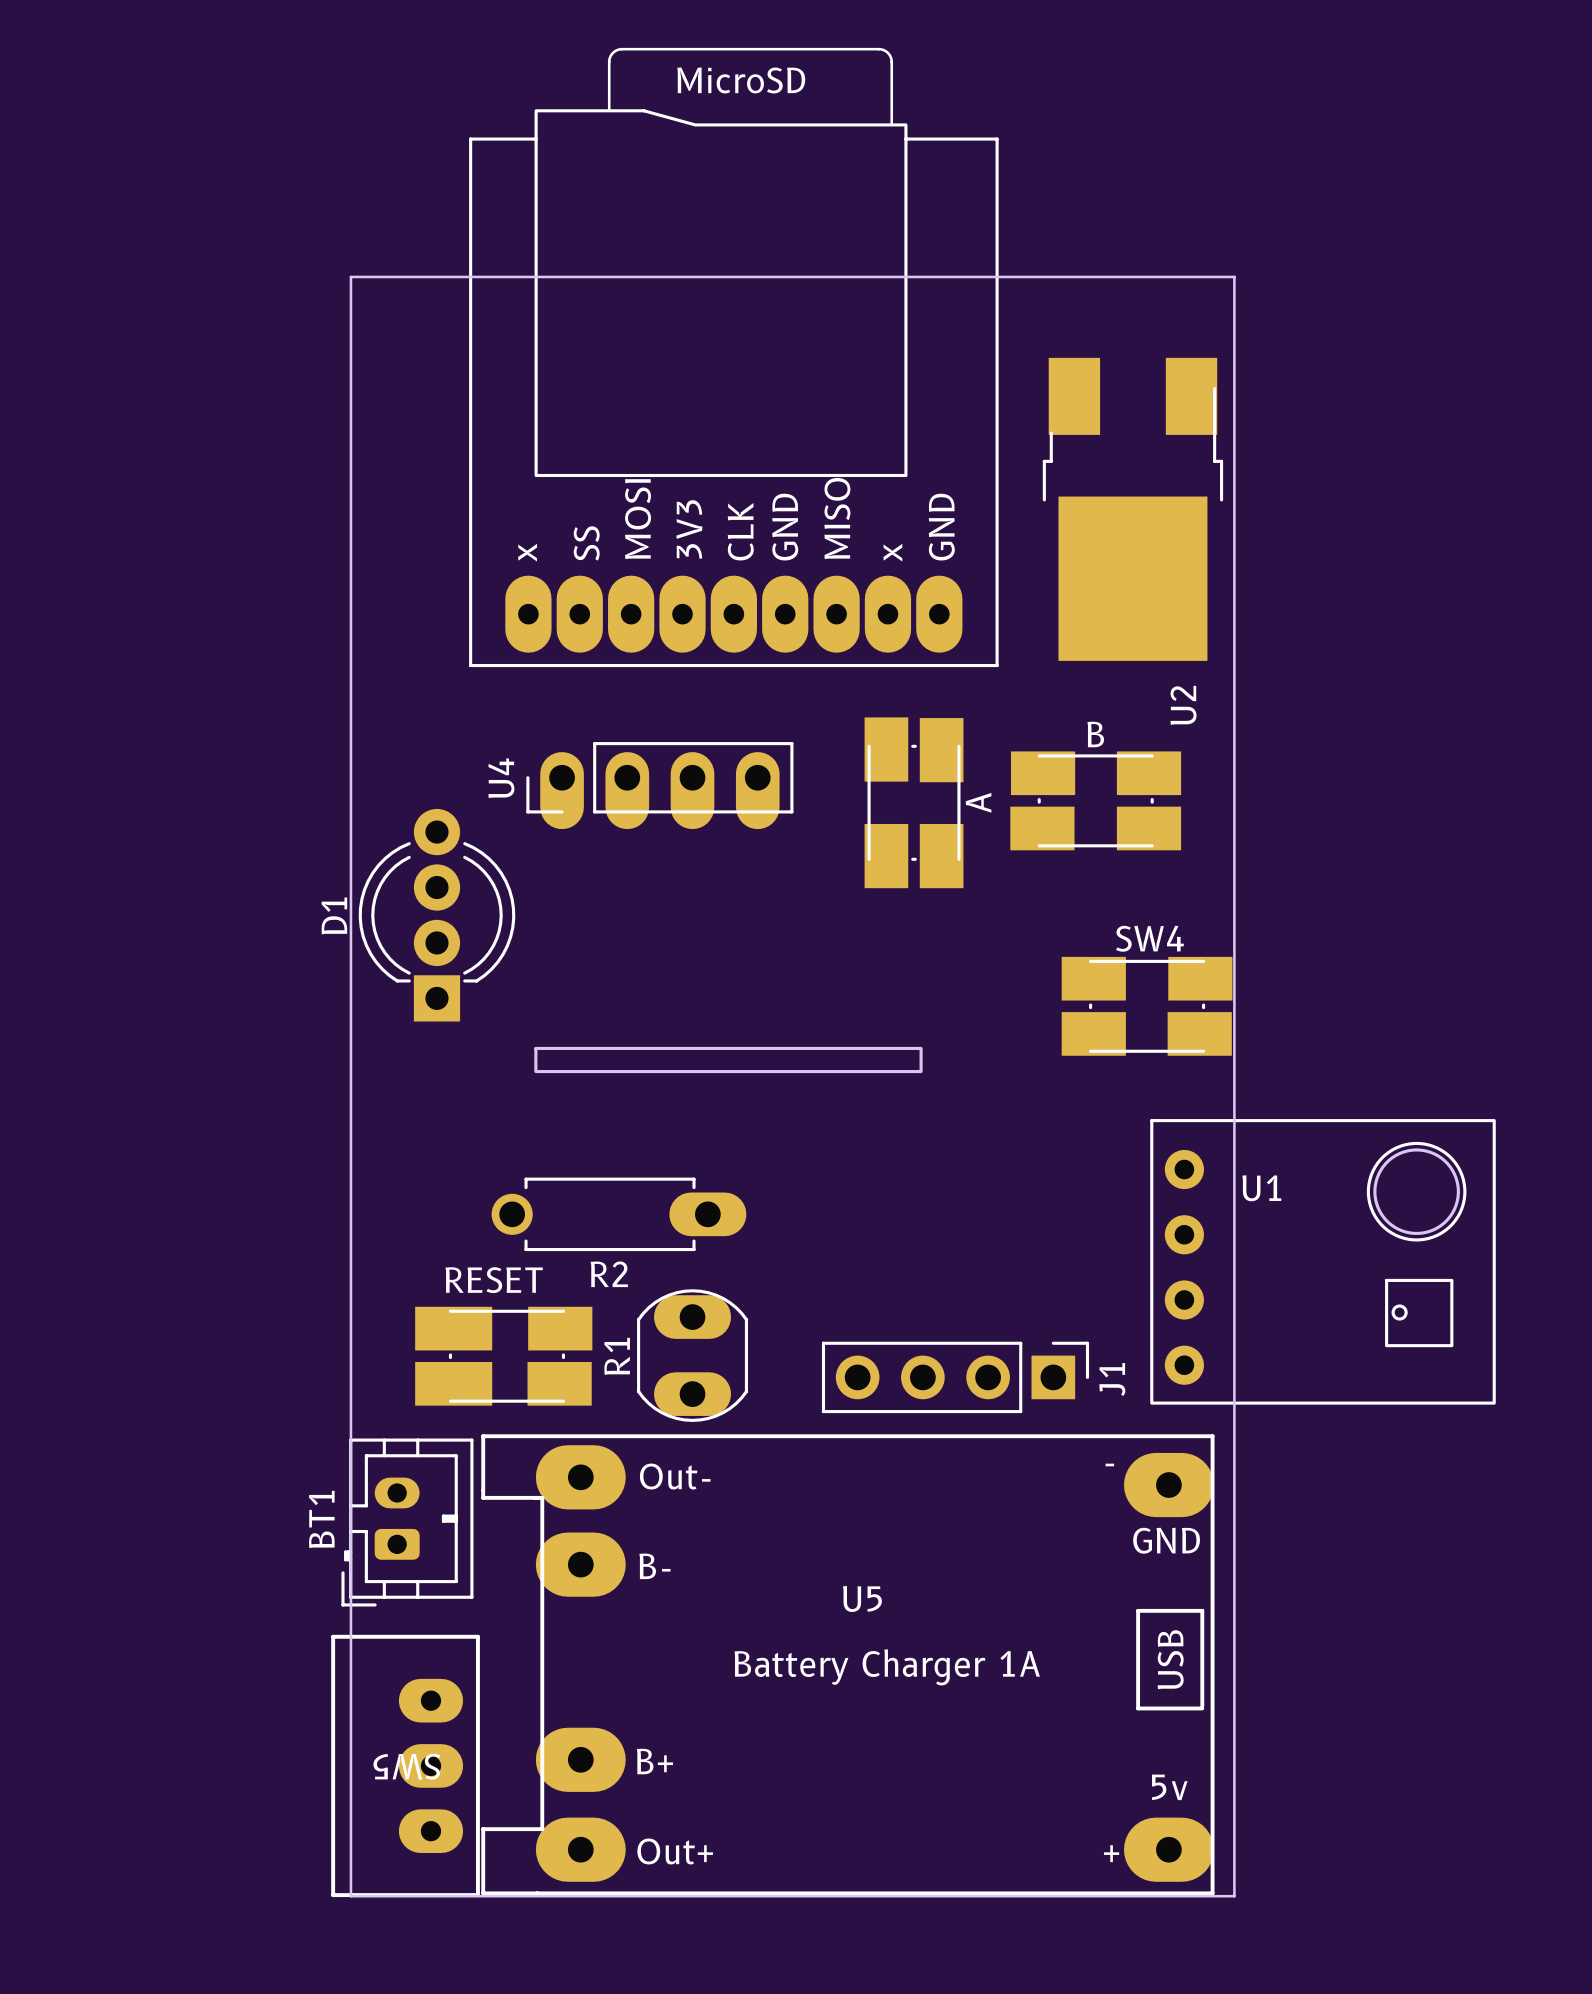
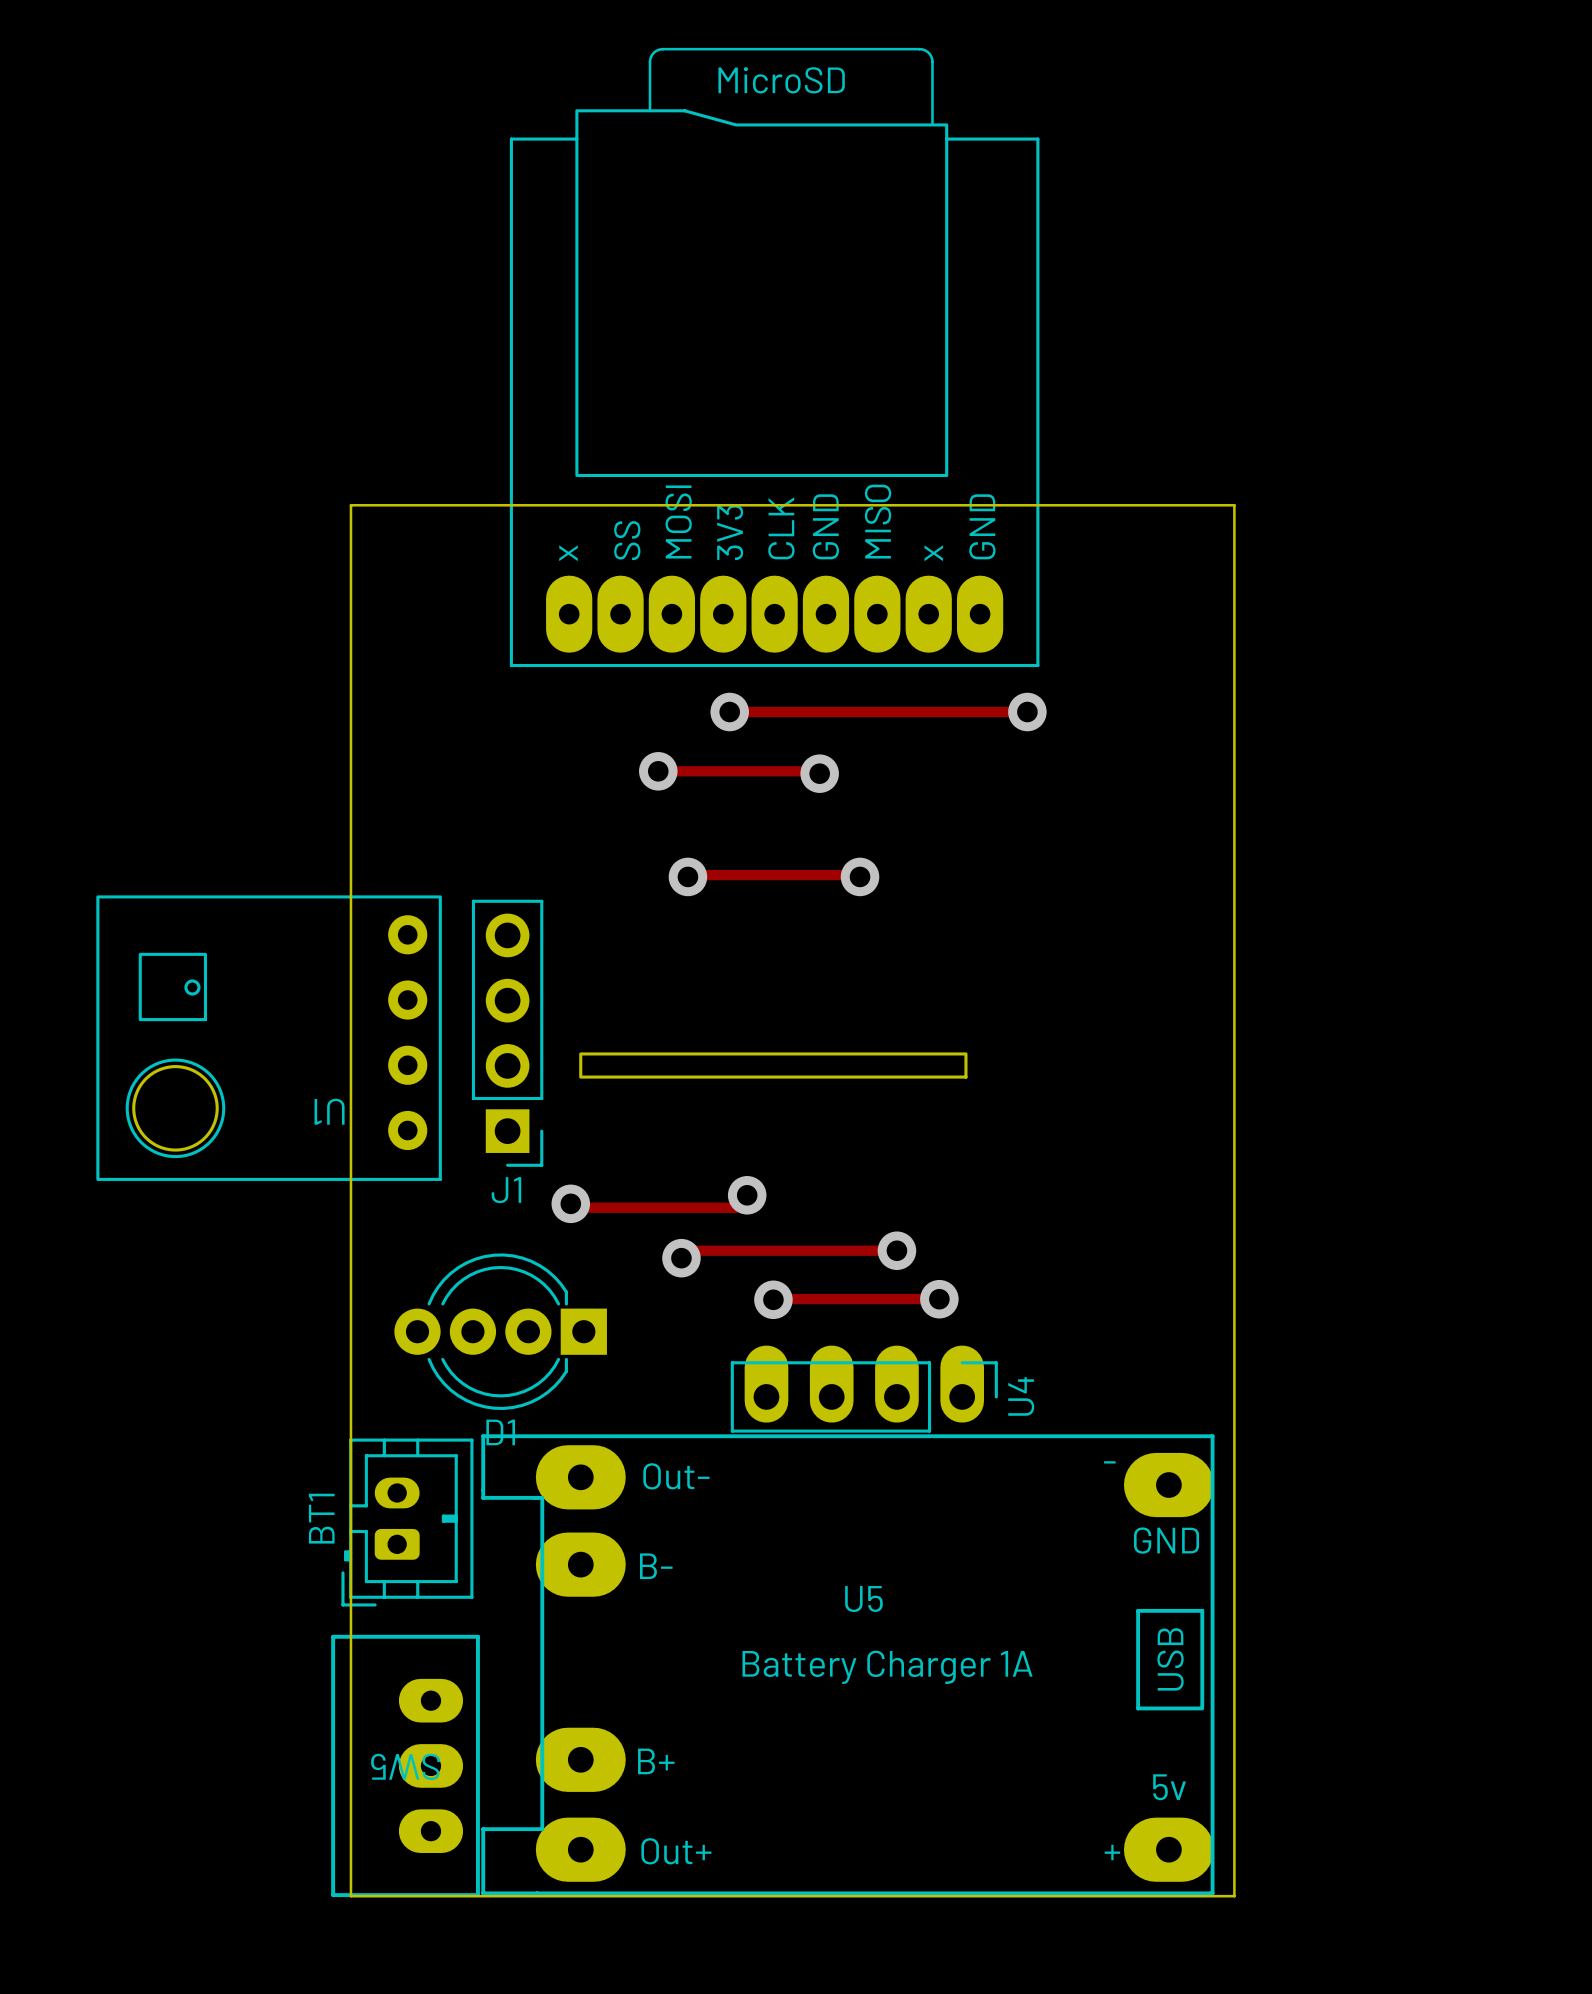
part position: (733, 357) -> (774, 357)
board edge: (350, 505) (350, 276) (1234, 276) (1234, 505) -> (350, 505) (1234, 505)
U2: (1132, 509) -> none
track: none -> (729, 712) (1027, 712)
via: none -> (729, 712)
via: none -> (1027, 712)
track: none -> (658, 771) (817, 771) (819, 773)
via: none -> (658, 771)
via: none -> (819, 773)
U4 rotation: 0° (659, 785) -> 180° (864, 1389)
U4 position: (659, 785) -> (864, 1389)
part: B (1095, 800) -> none
part: A (914, 802) -> none
track: none -> (687, 876) (689, 875) (858, 875) (860, 876)
via: none -> (687, 876)
via: none -> (860, 876)
D1 rotation: 0° (436, 915) -> 90° counterclockwise (500, 1331)
D1 position: (436, 915) -> (500, 1331)
SW4: (1147, 1006) -> none
part position: (728, 1059) -> (773, 1065)
track: none -> (747, 1195) (734, 1207) (574, 1207) (570, 1203)
via: none -> (747, 1195)
via: none -> (570, 1203)
R2: (619, 1214) -> none
track: none -> (896, 1250) (688, 1250) (681, 1258)
via: none -> (896, 1250)
via: none -> (681, 1258)
U1 rotation: 0° (1323, 1261) -> 180° (269, 1038)
U1 position: (1323, 1261) -> (269, 1038)
via: none -> (773, 1299)
track: none -> (939, 1299) (773, 1299)
via: none -> (939, 1299)
R1: (692, 1355) -> none
part: RESET (503, 1356) -> none
J1 rotation: 0° (955, 1377) -> 90° clockwise (507, 1033)
J1 position: (955, 1377) -> (507, 1033)

